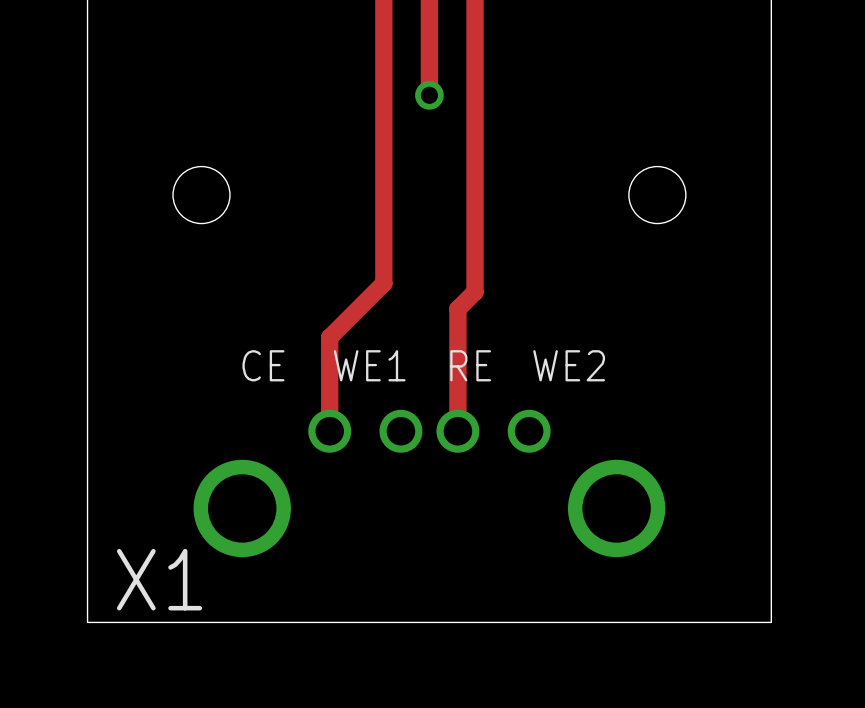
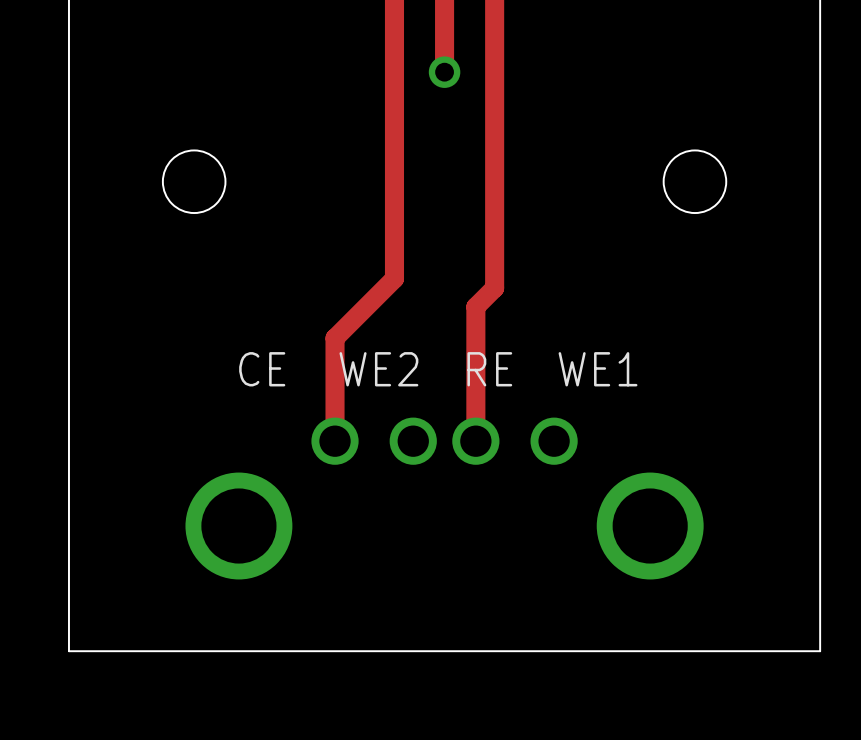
text: WE1 (369, 365) -> WE2 (378, 369)
text: WE2 (569, 365) -> WE1 (598, 369)
X1 name: X1 (159, 579) -> none

